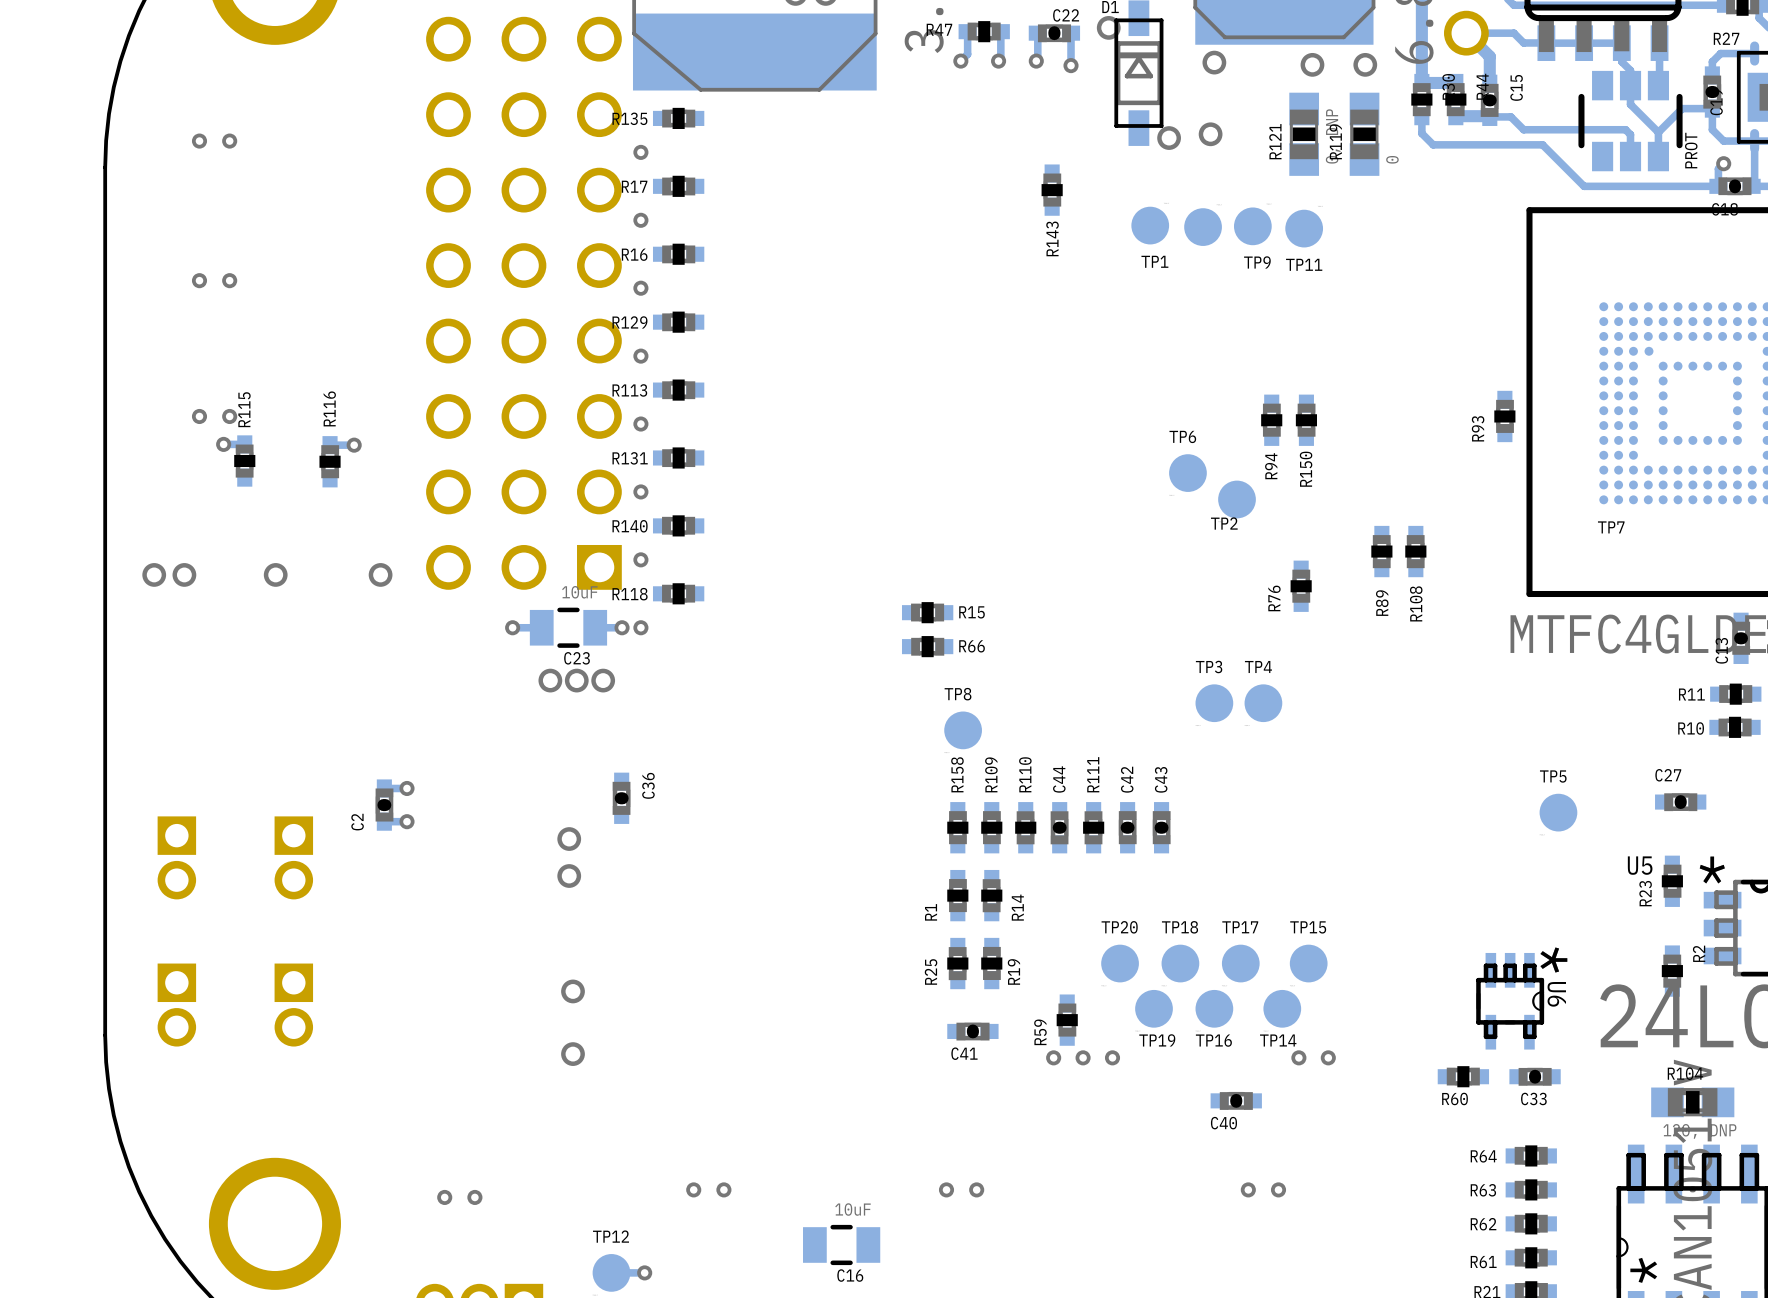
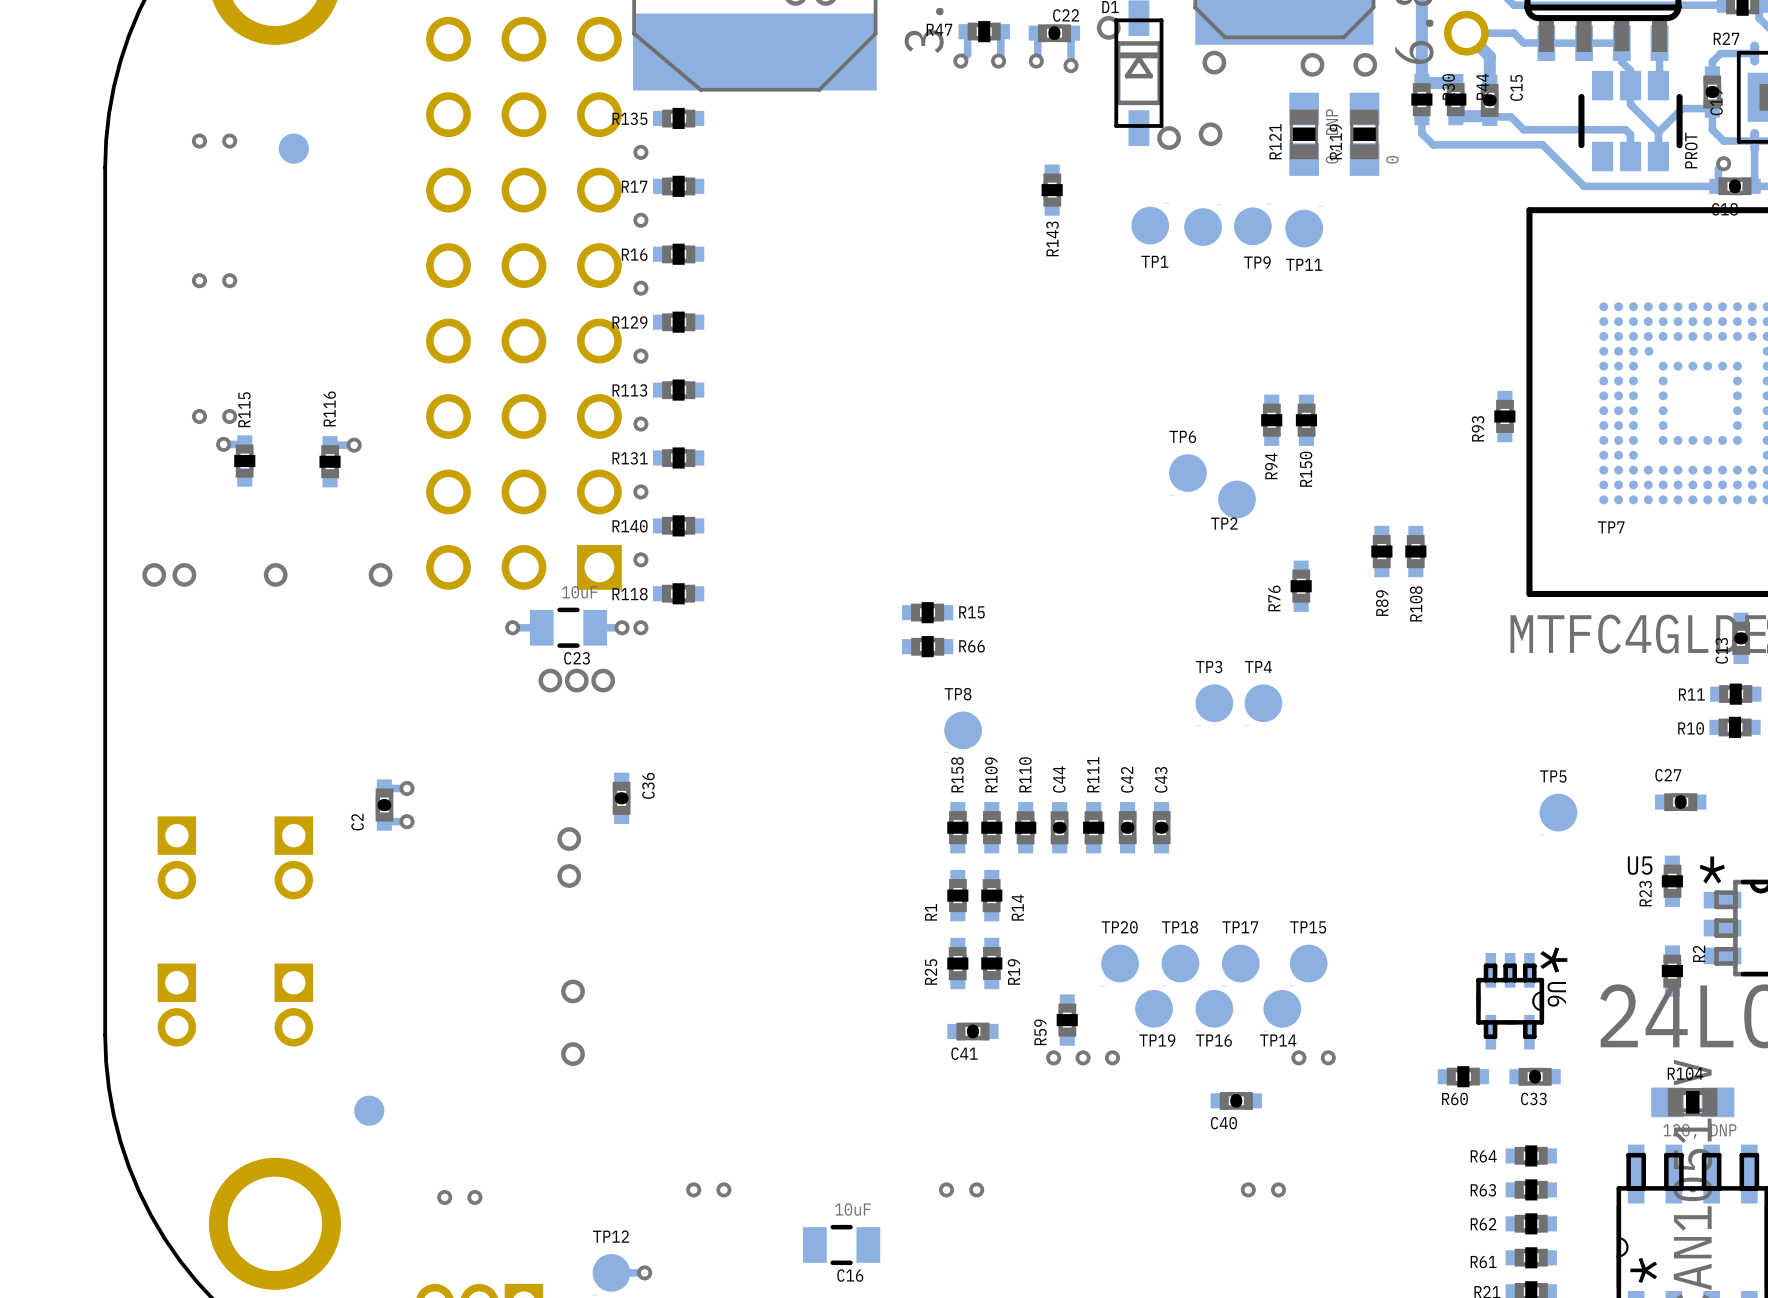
part: none -> (293, 148)
part: none -> (369, 1110)

